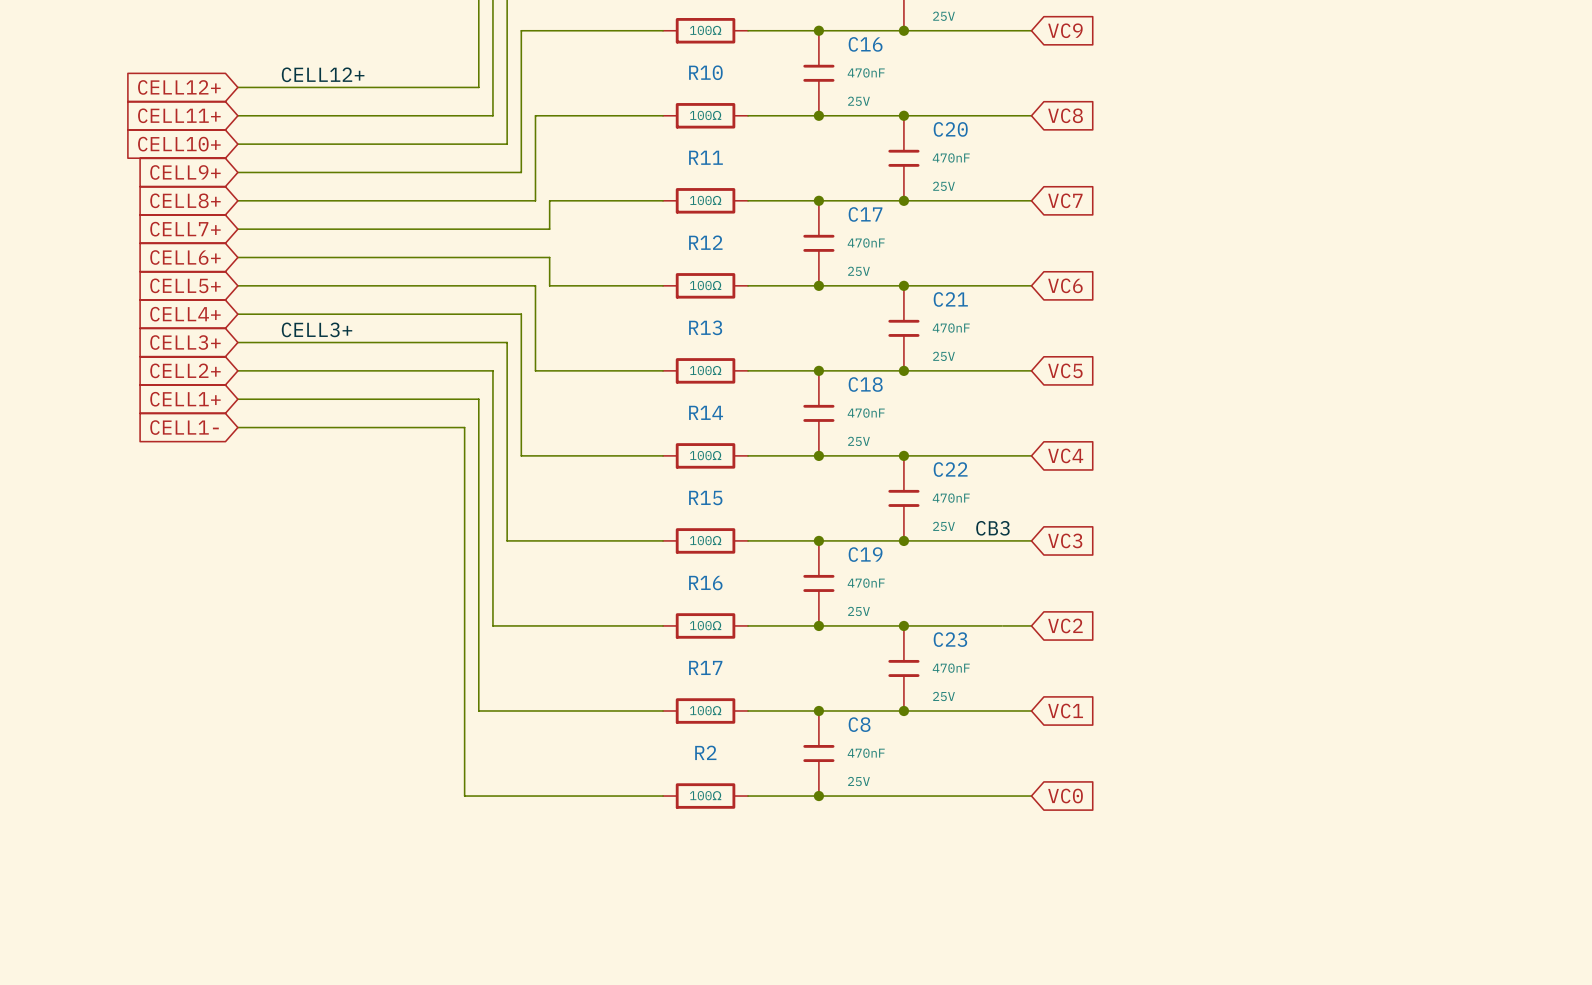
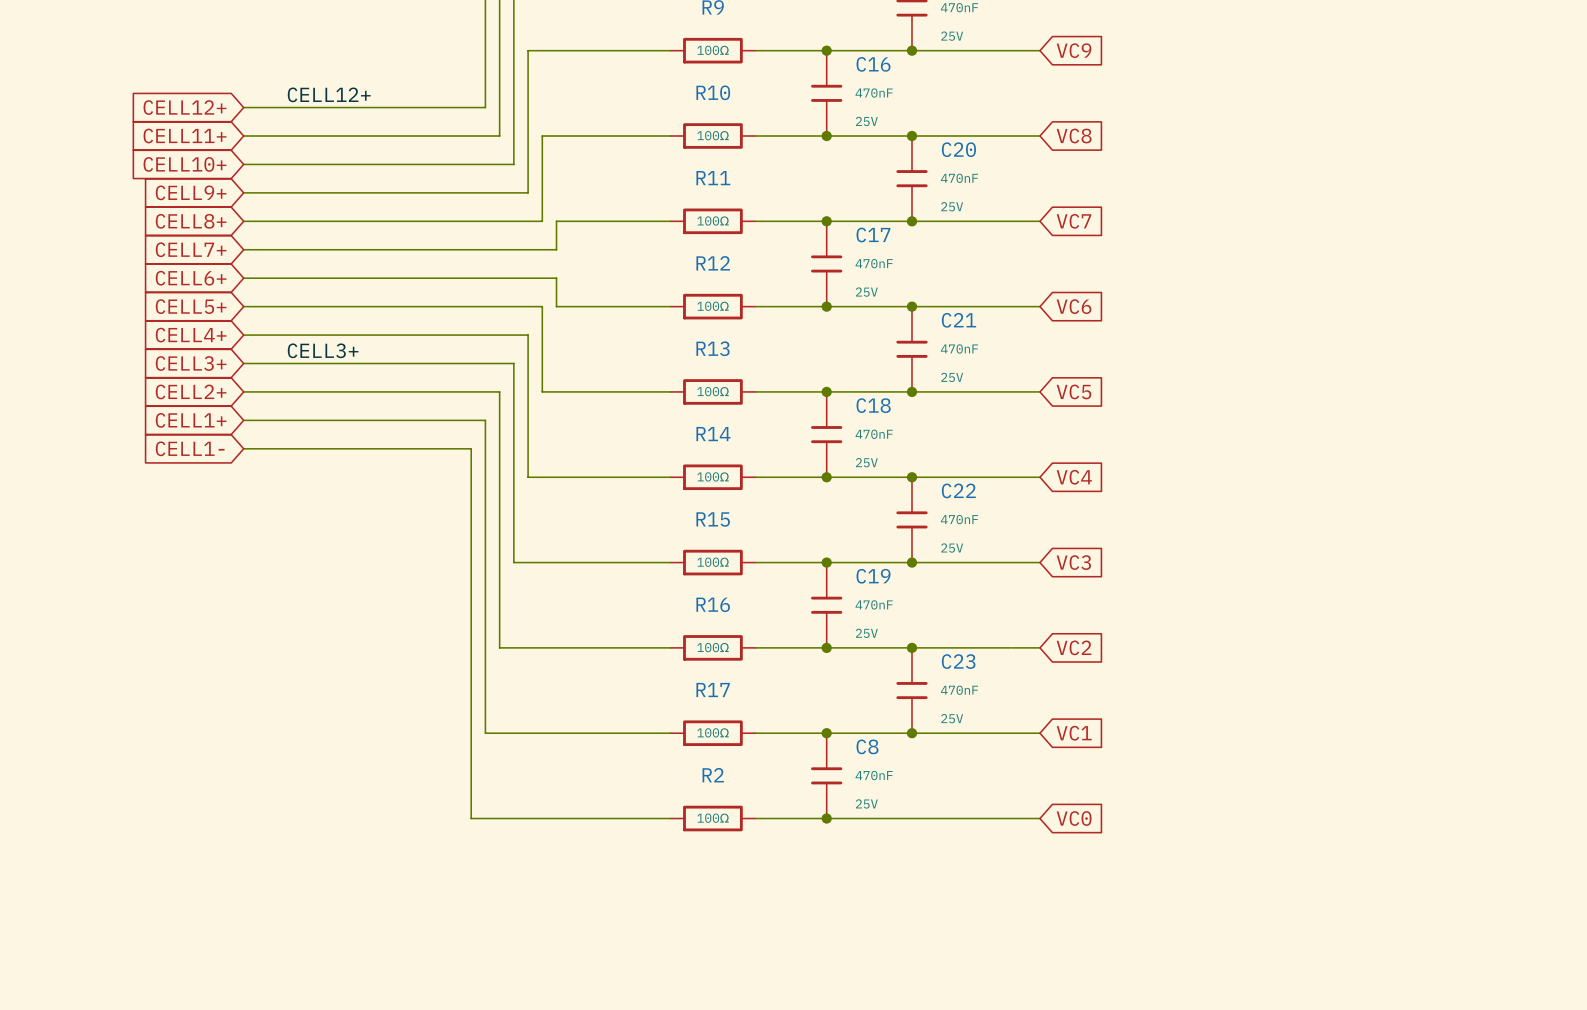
label: CB3 (992, 528) -> none

